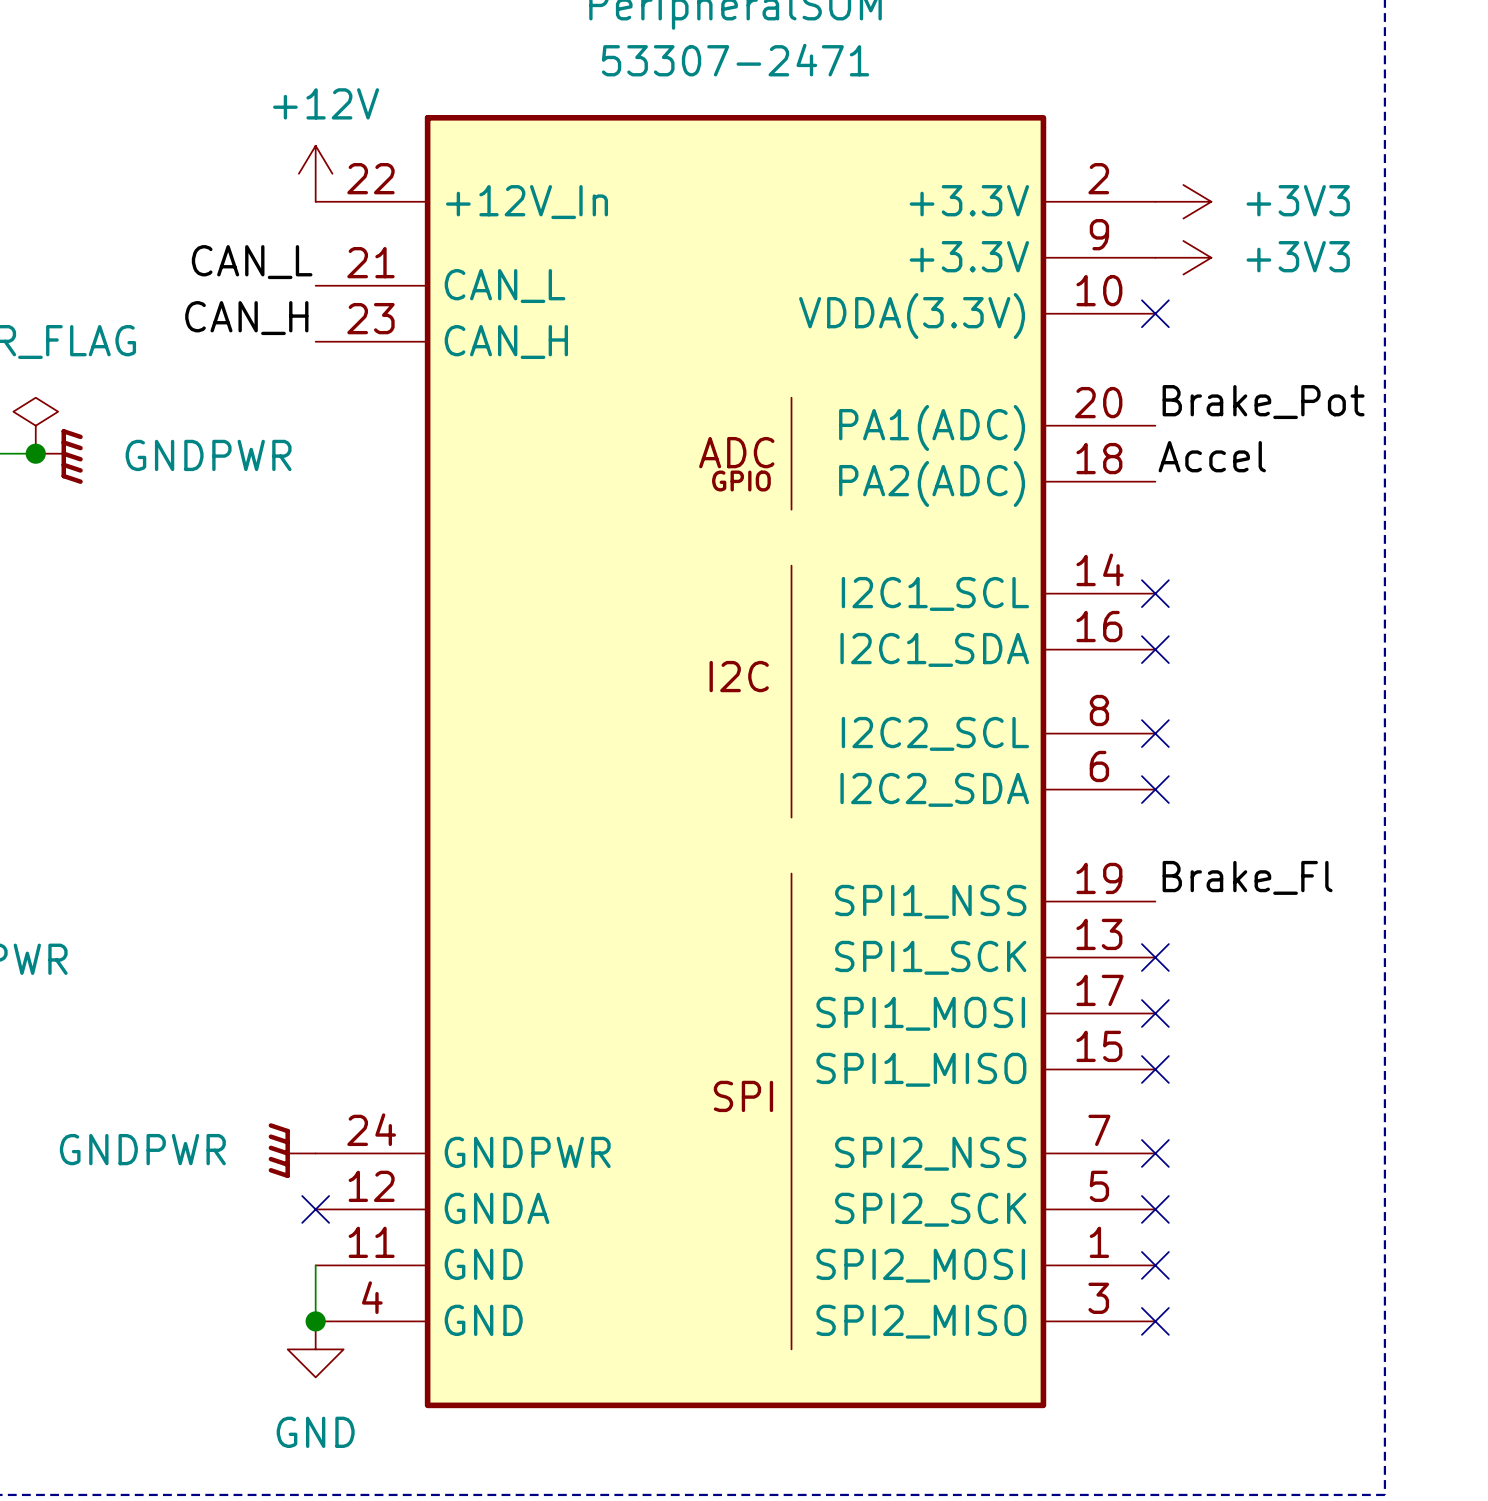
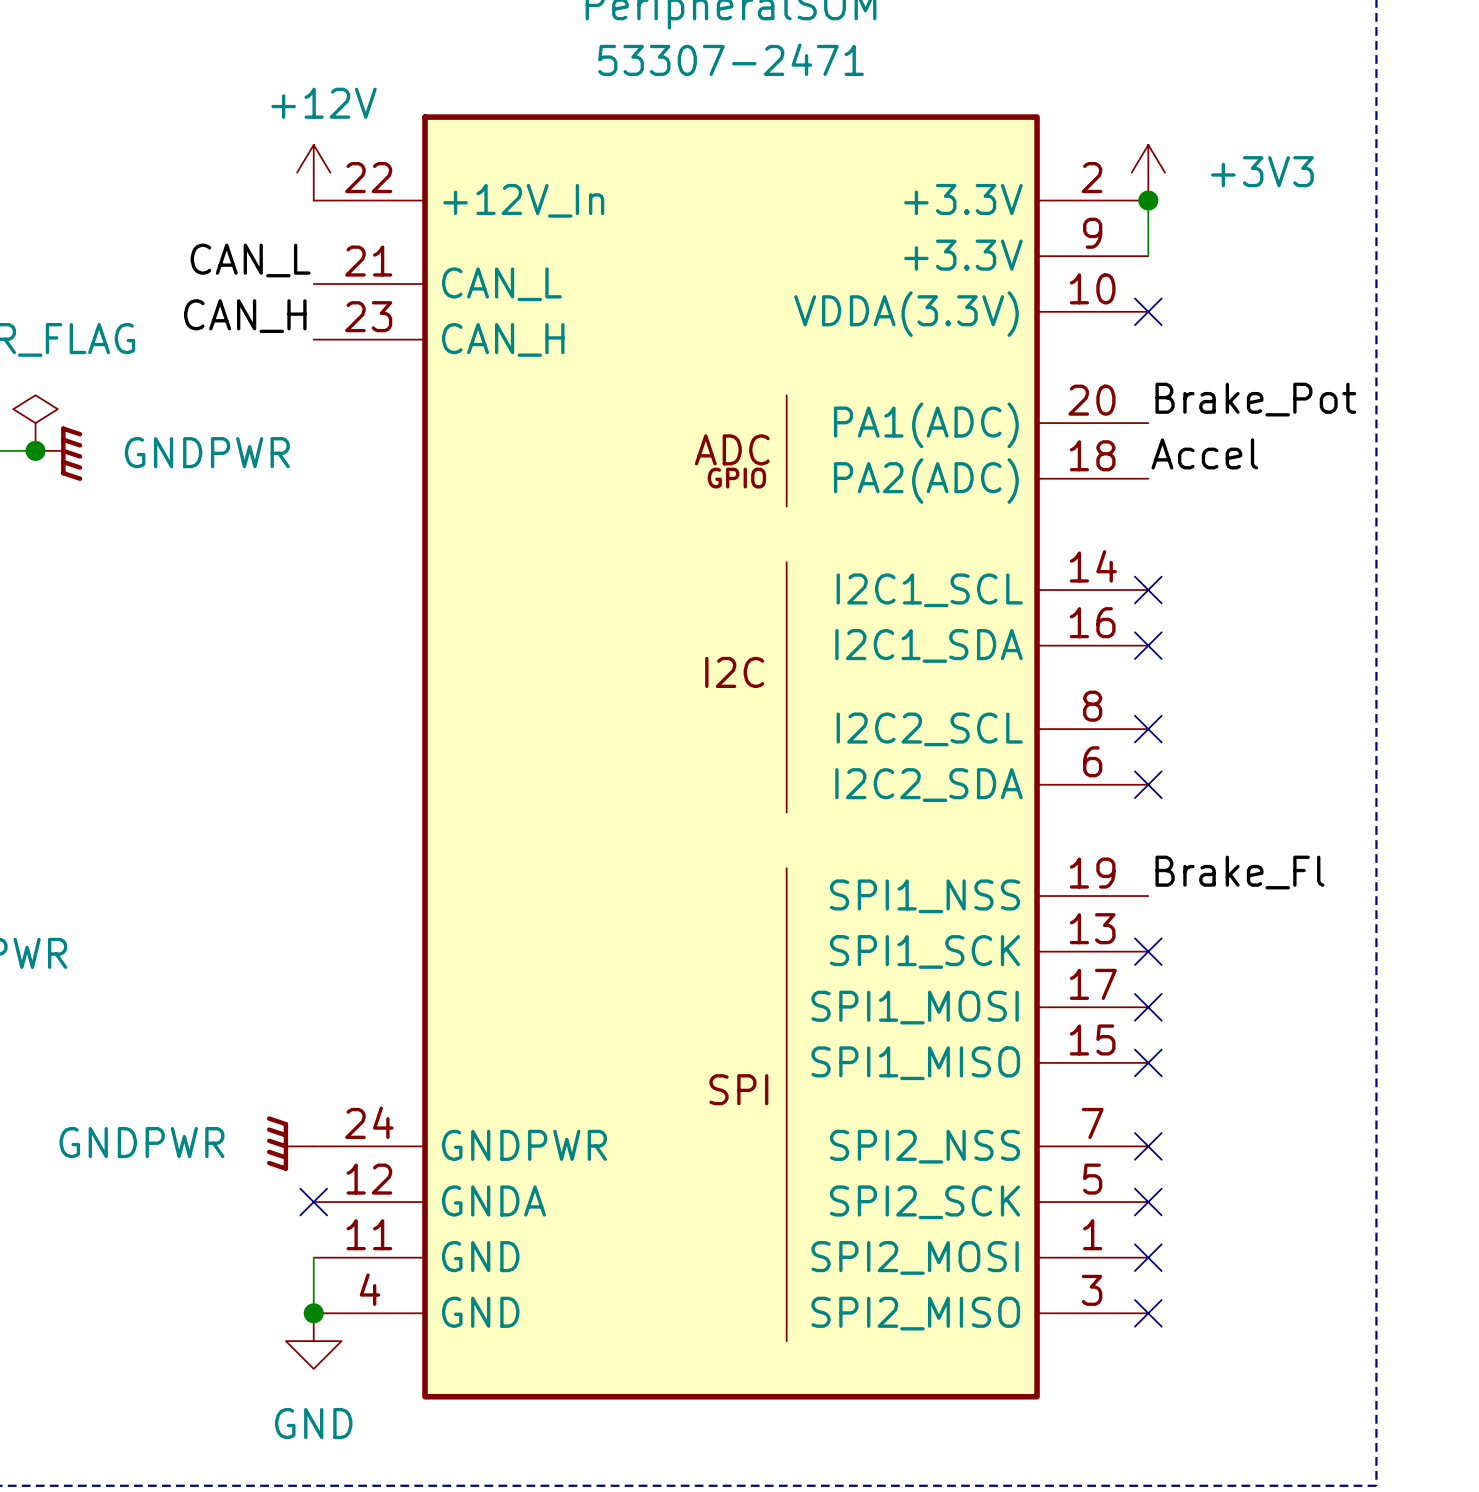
wire: none -> (1148, 200) (1148, 256)
junction: none -> (1148, 200)
power symbol rotation: 0° (1183, 201) -> 90° counterclockwise (1148, 172)
power symbol position: +3V3 (1183, 201) -> +3V3 (1148, 172)
power symbol: +3V3 (1183, 257) -> none

